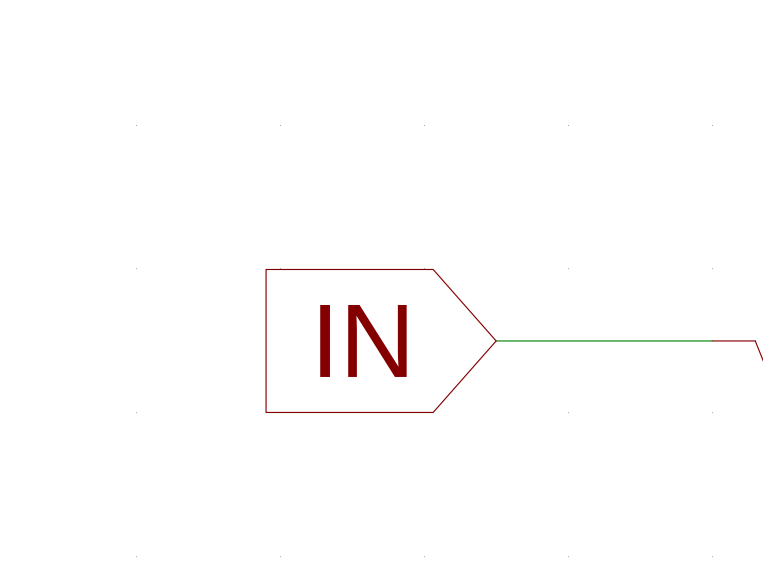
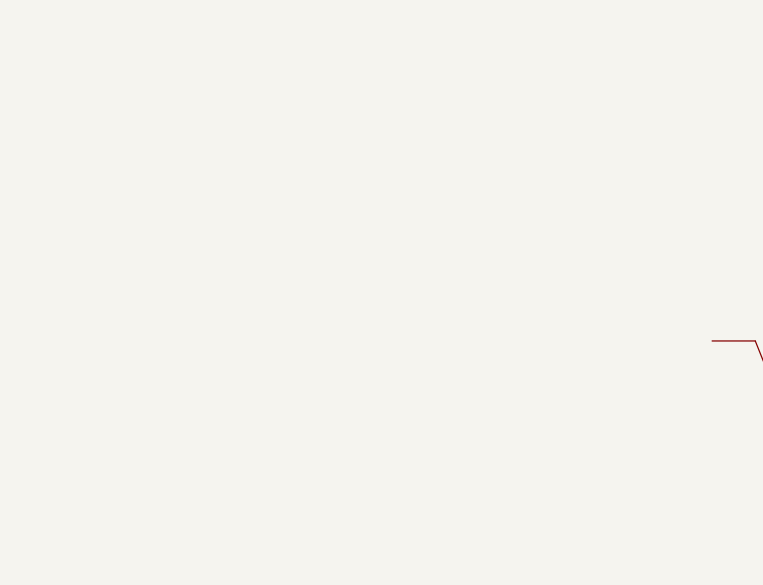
global label: IN (363, 340) -> none
wire: (496, 340) (712, 340) -> none

